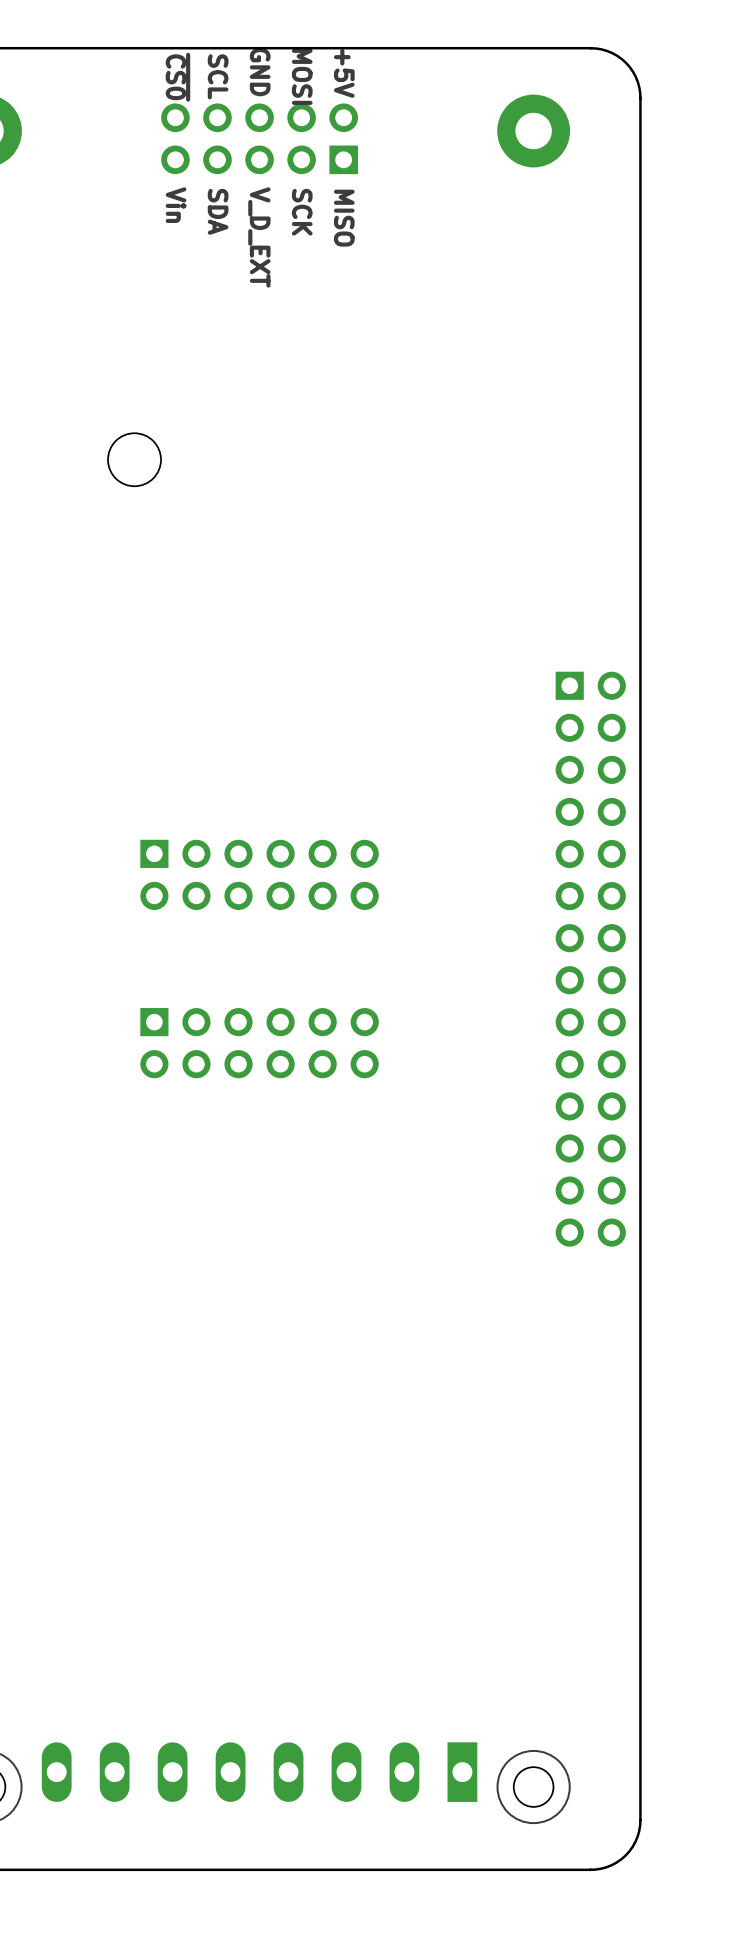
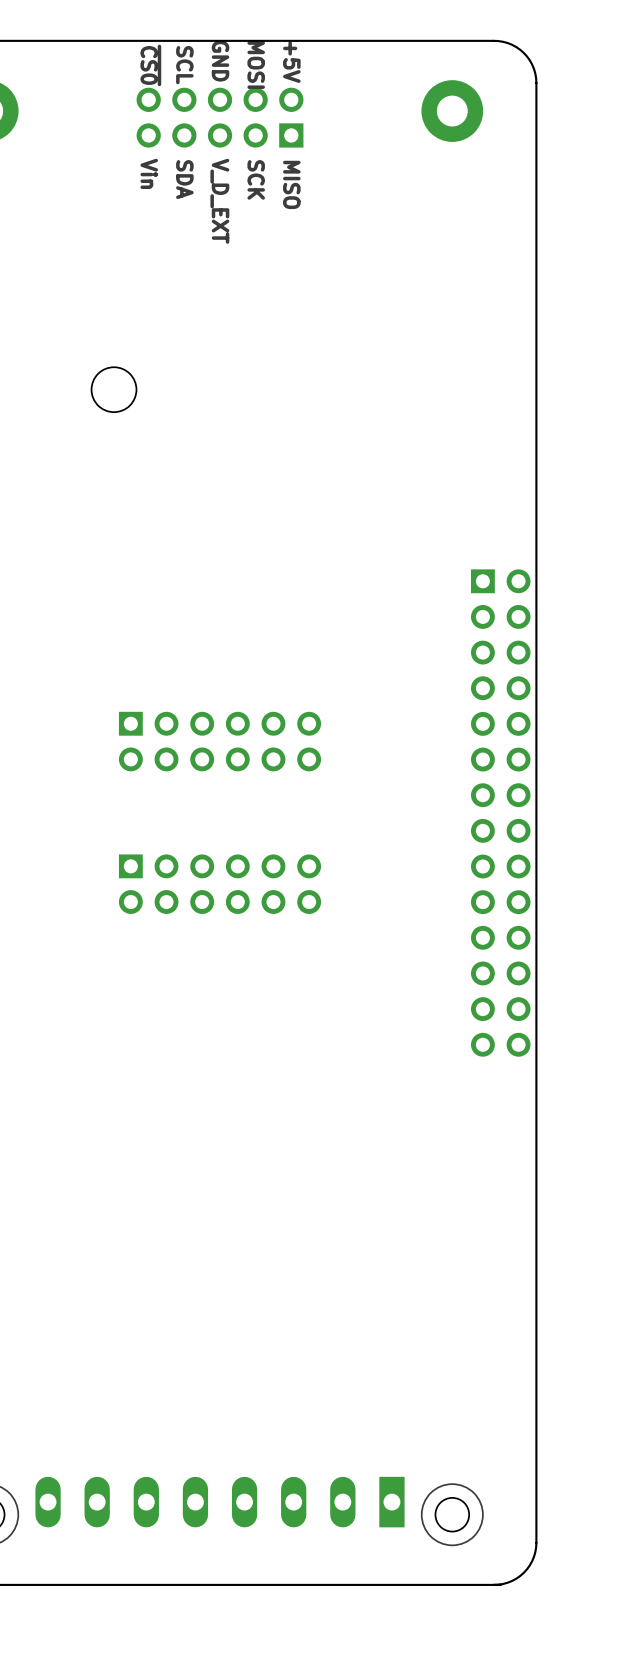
board edge: (582, 48) (601, 49) (621, 59) (635, 76) (640, 98) -> (493, 40) (512, 44) (523, 53) (532, 64) (536, 82) (536, 1542) (533, 1556) (523, 1572) (512, 1580) (493, 1584)
board edge: (640, 97) (640, 1820) (635, 1841) (625, 1855) (611, 1865) (590, 1869) -> none

